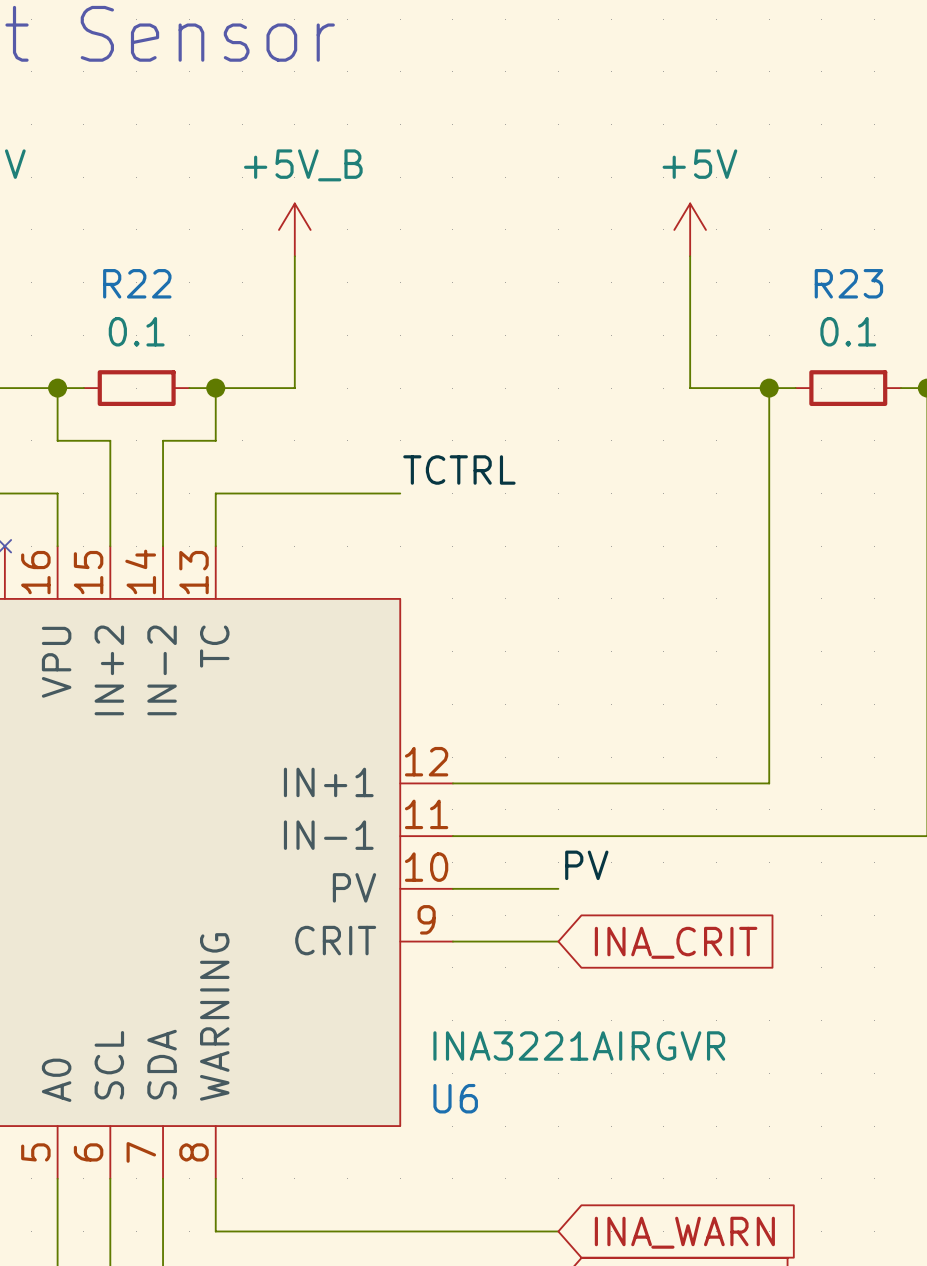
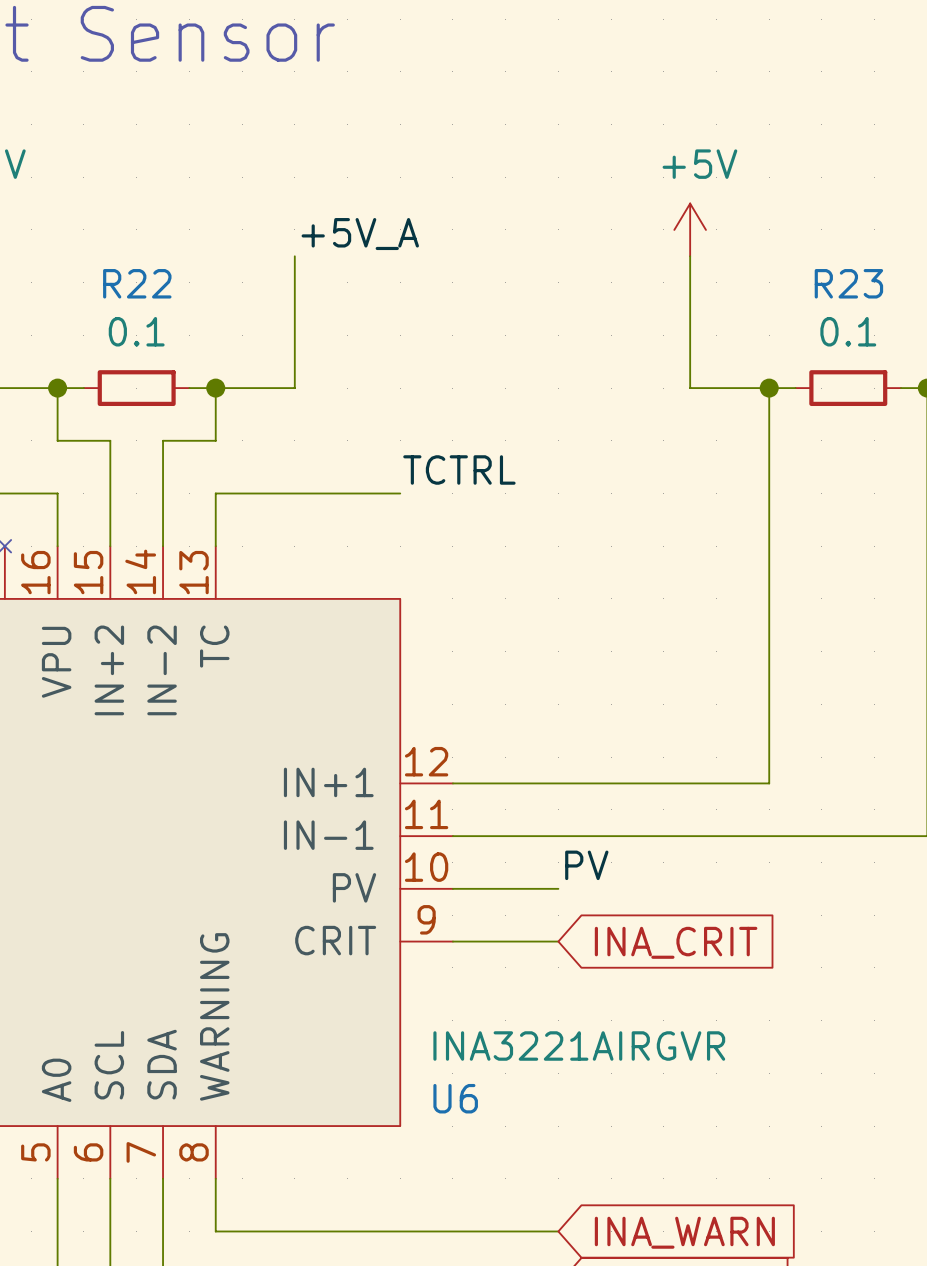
power symbol: +5V_B (294, 229) -> none
label: none -> +5V_A (360, 234)

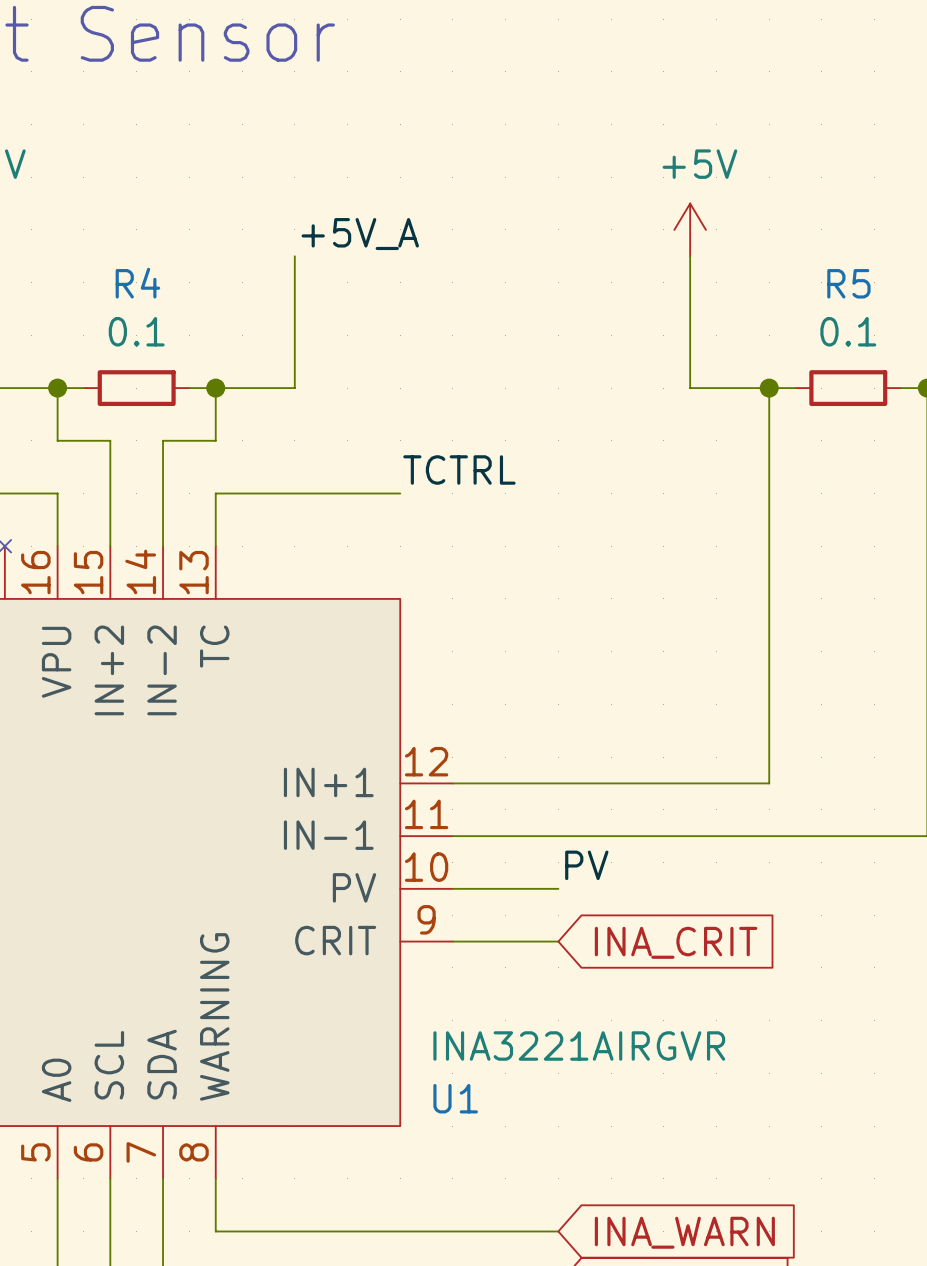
R22 name: R22 (137, 283) -> R4 (137, 283)
R23 name: R23 (848, 283) -> R5 (848, 283)
U6 name: U6 (455, 1098) -> U1 (455, 1098)

